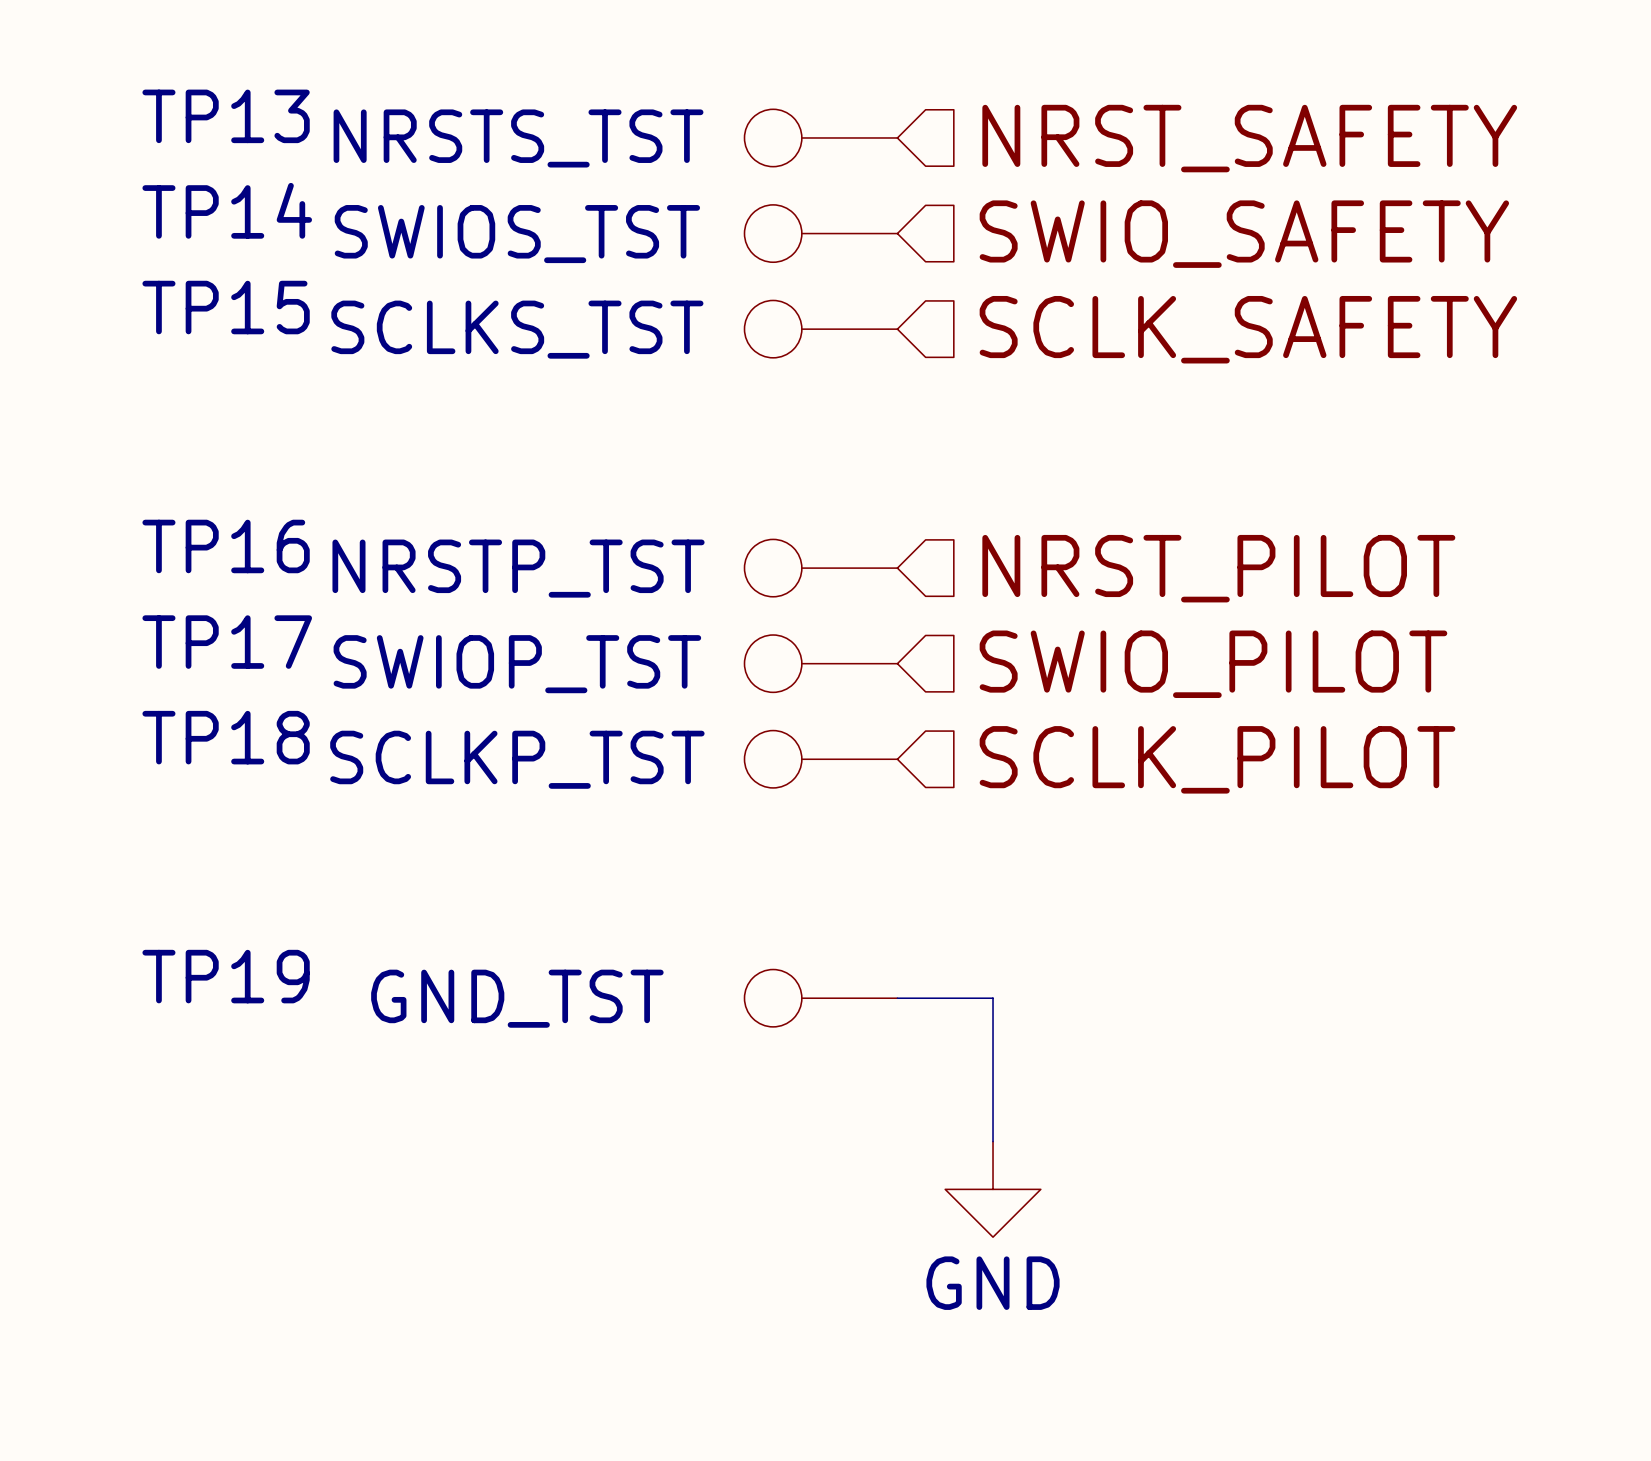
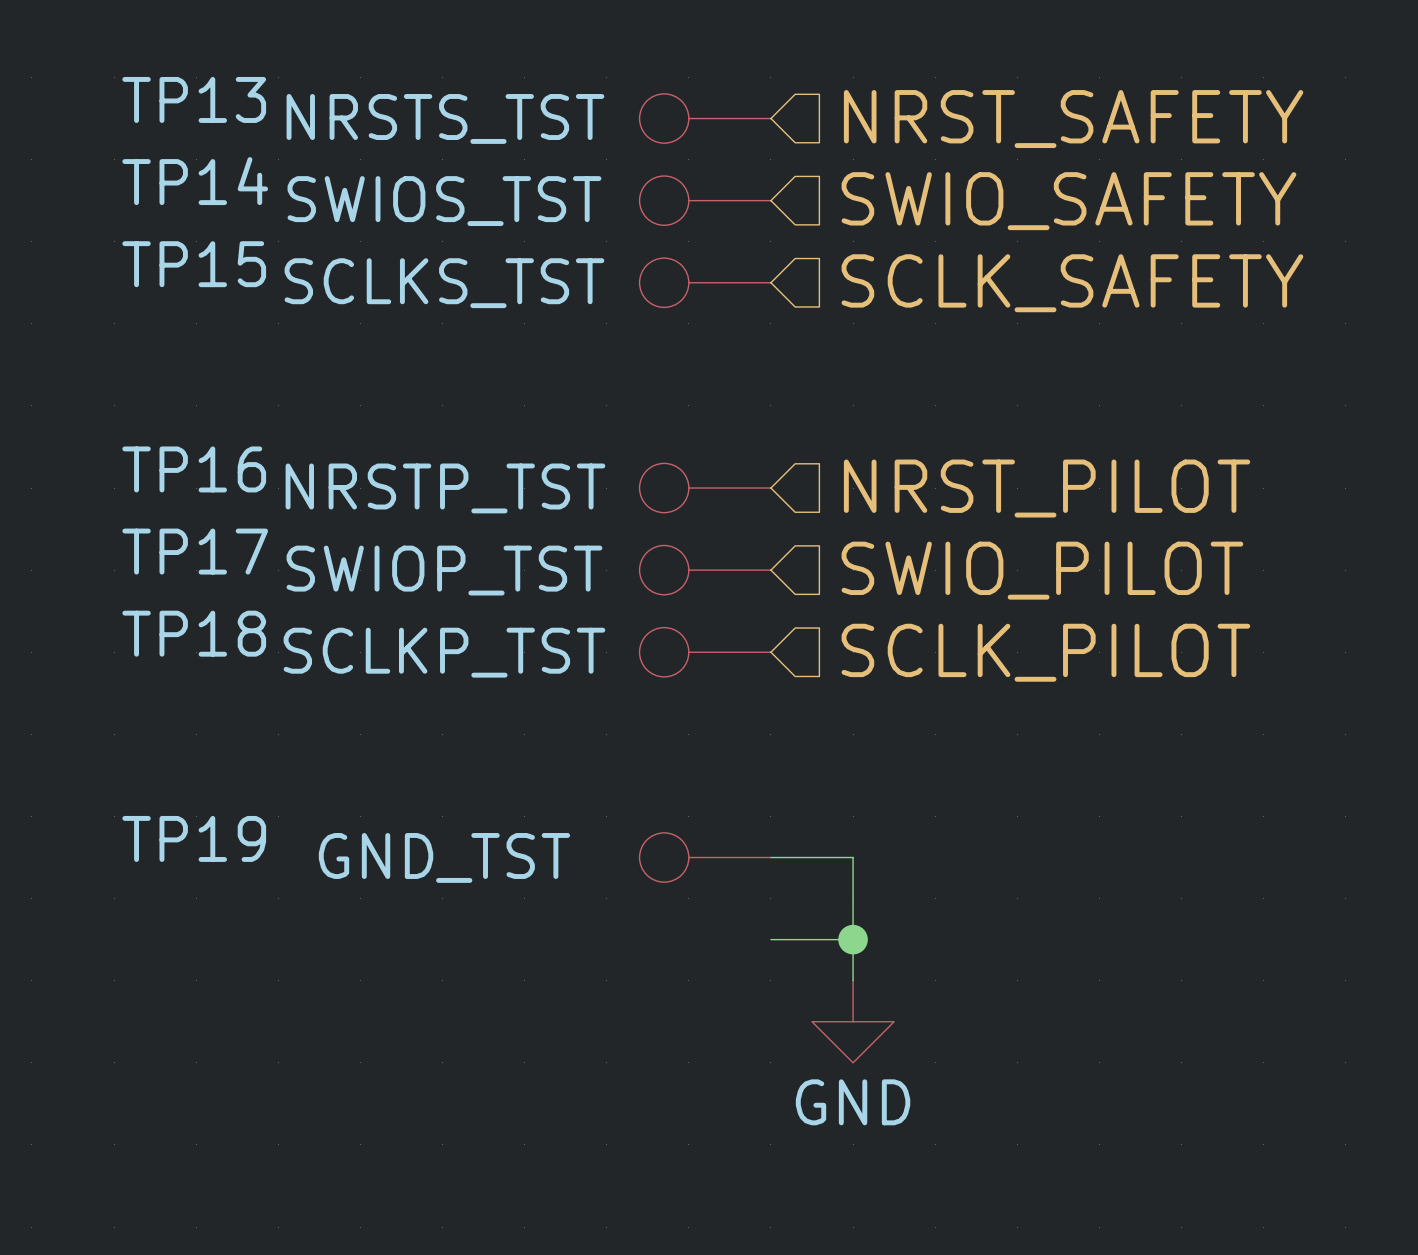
wire: none -> (770, 939) (853, 939)
junction: none -> (853, 939)

